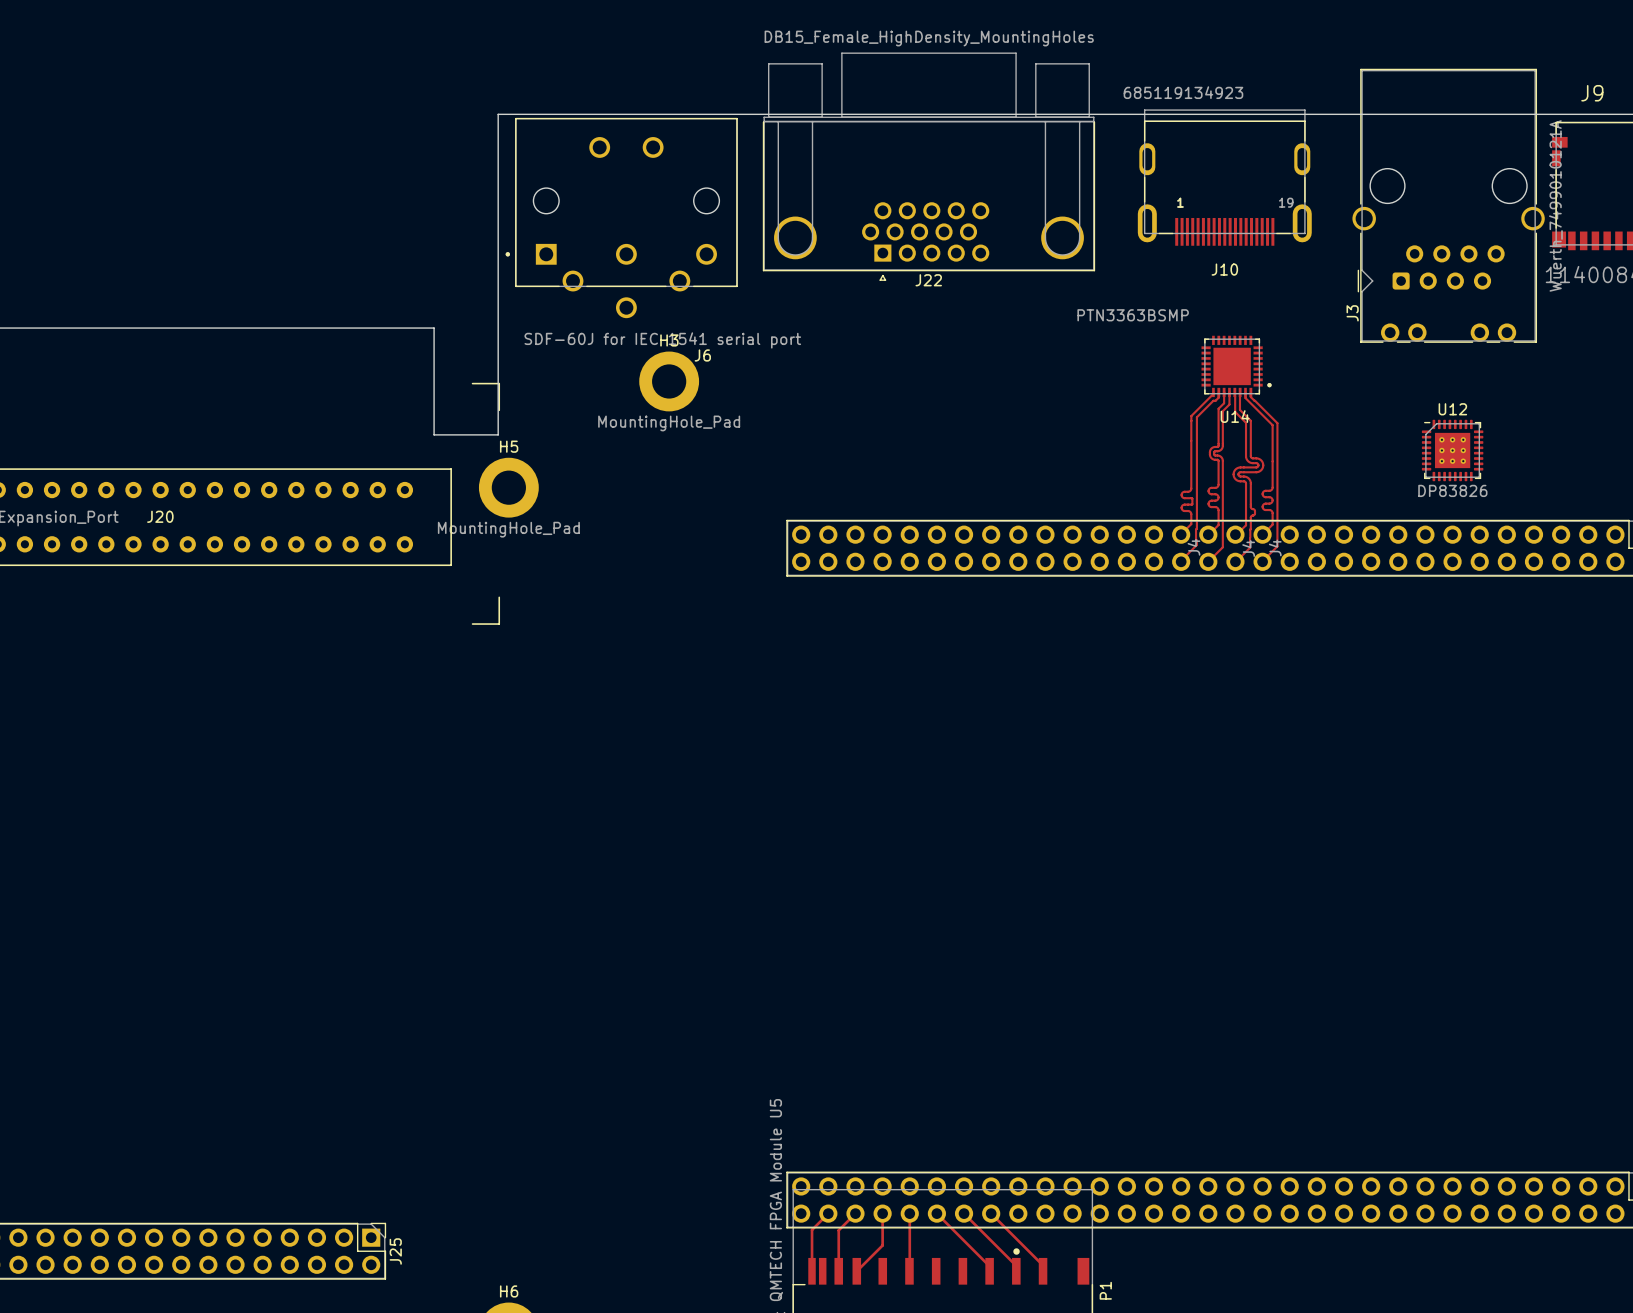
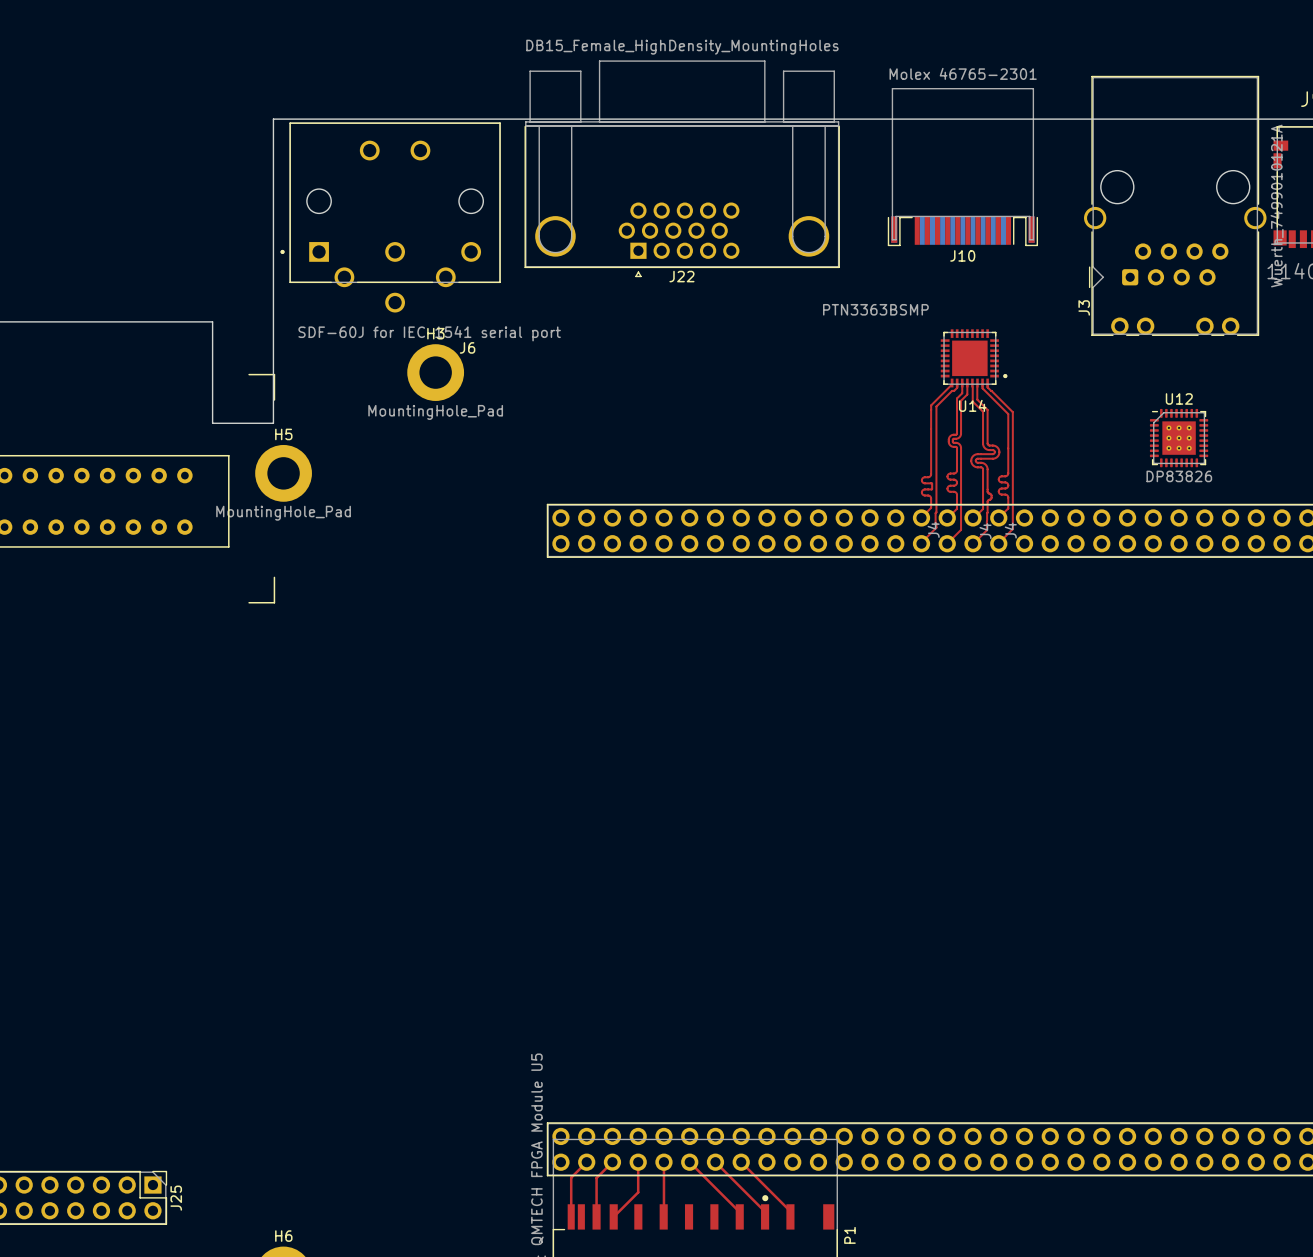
J10 value: 685119134923 (1183, 92) -> Molex 46765-2301 (963, 73)
J10 footprint: [1137, 109, 1312, 246] -> [887, 88, 1038, 247]

